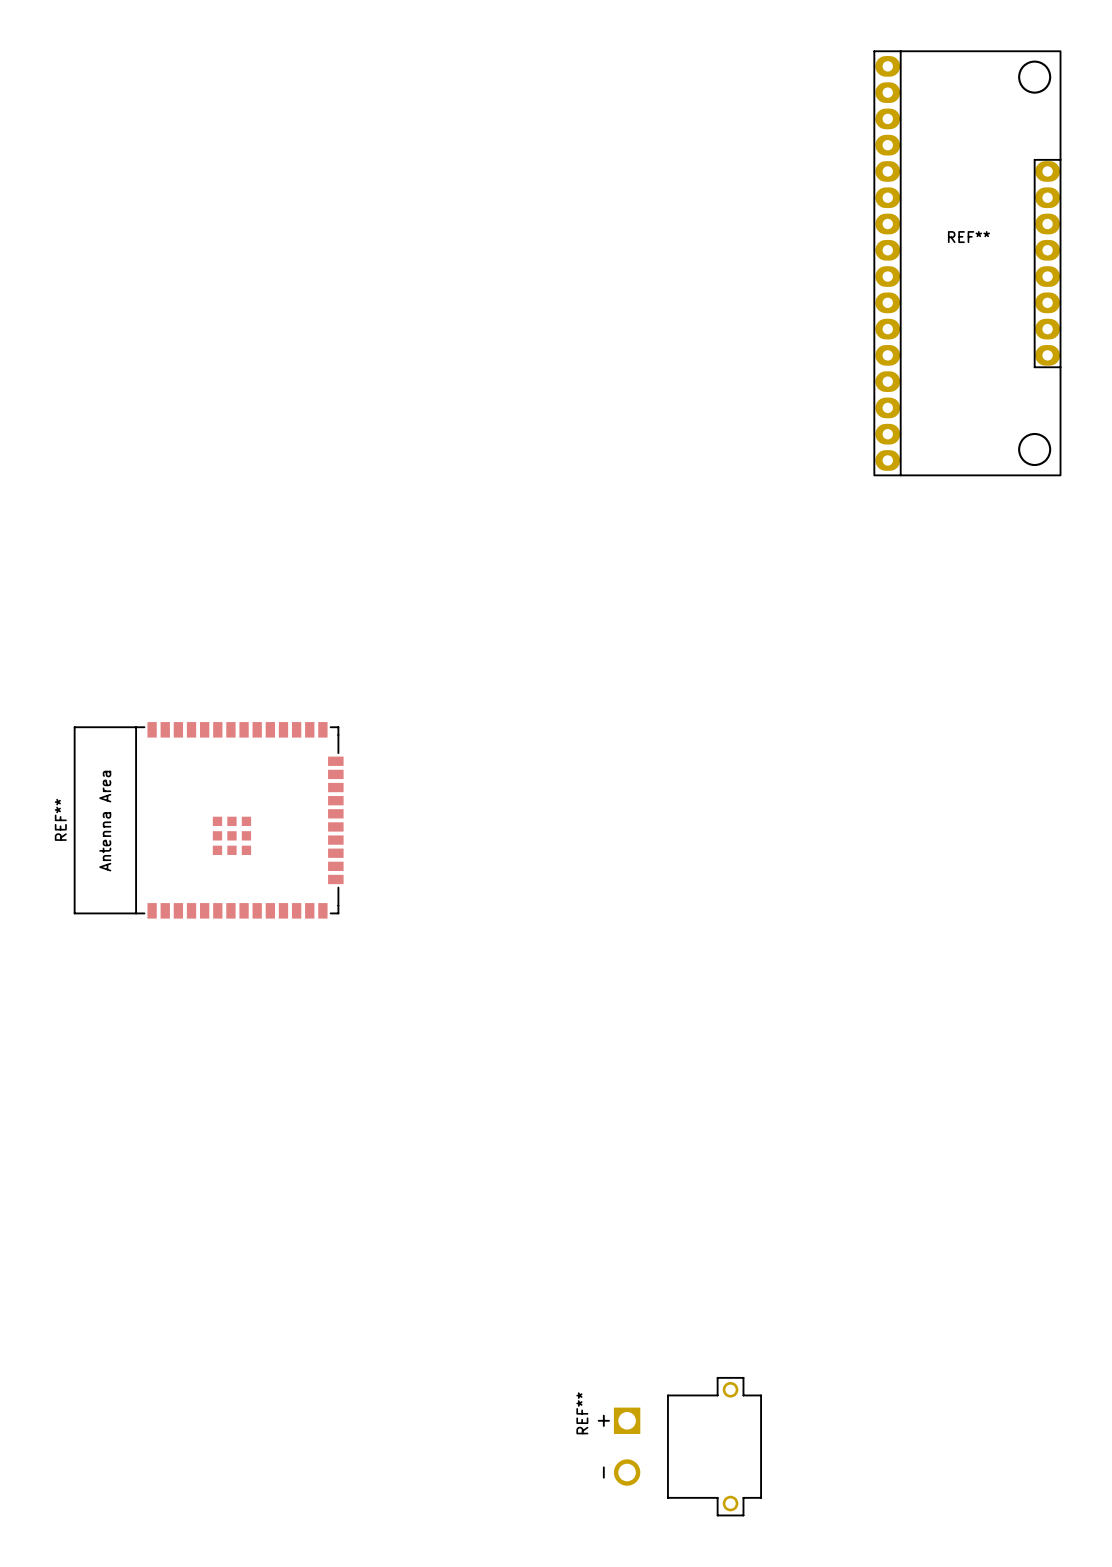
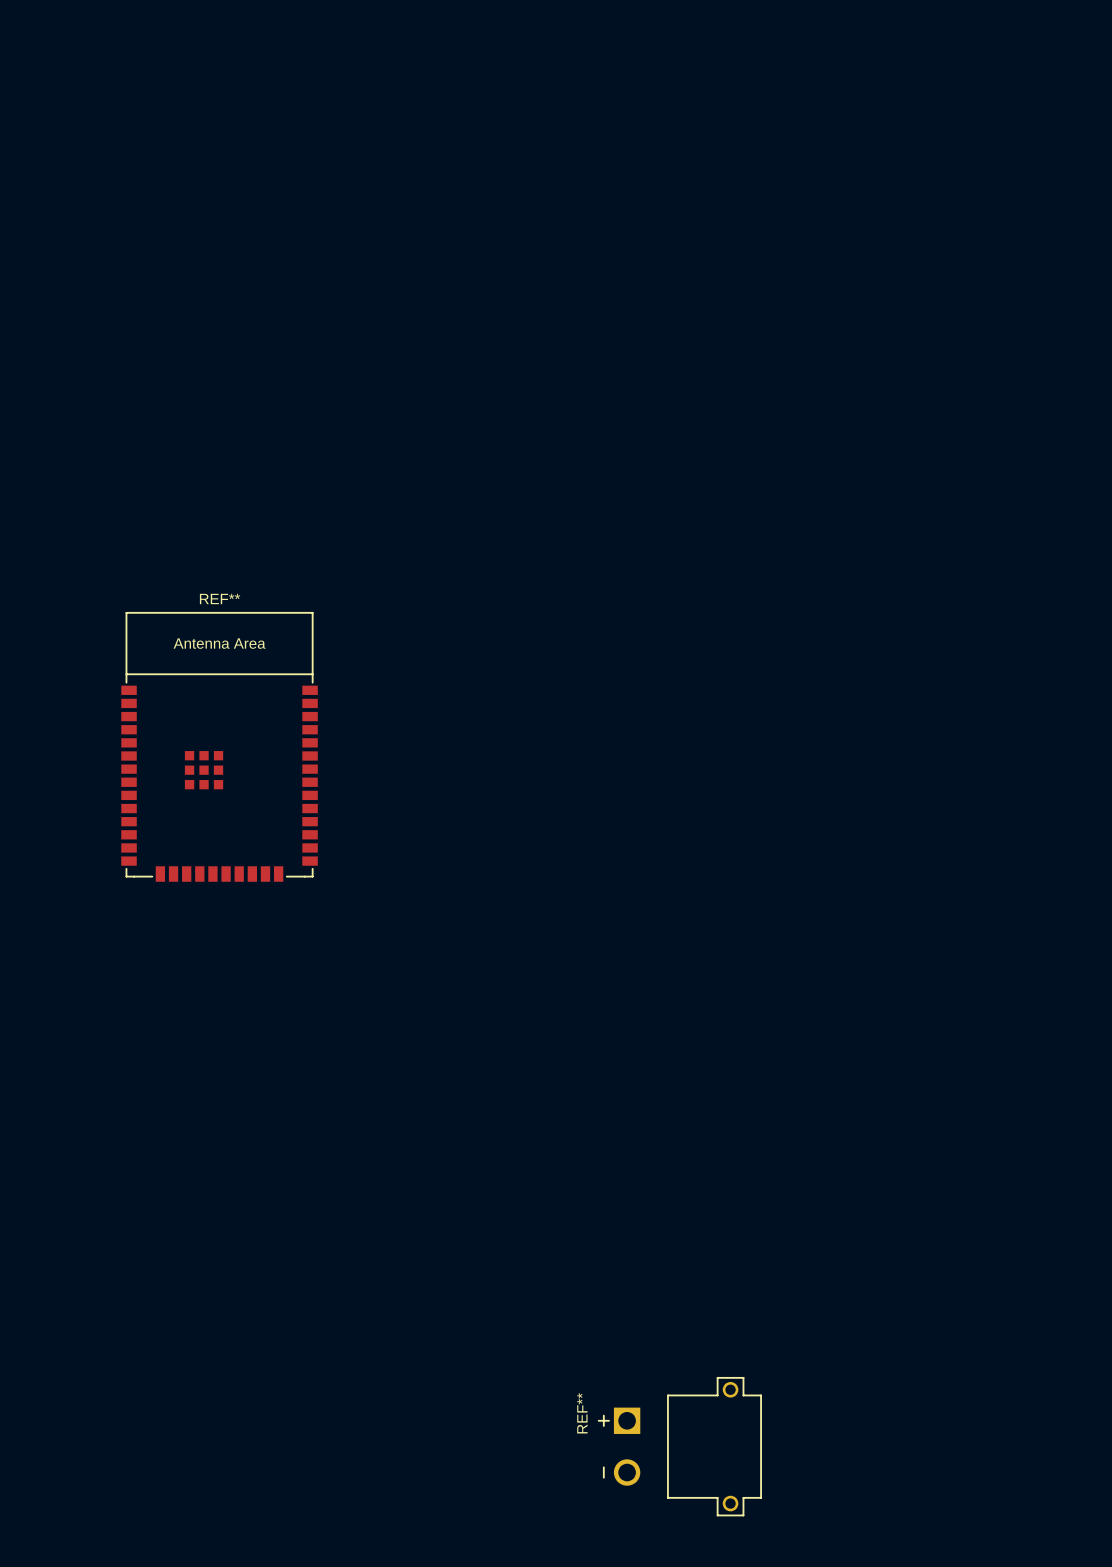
REF**: (967, 263) -> none
REF** rotation: 0° (208, 820) -> 90° clockwise (219, 746)

